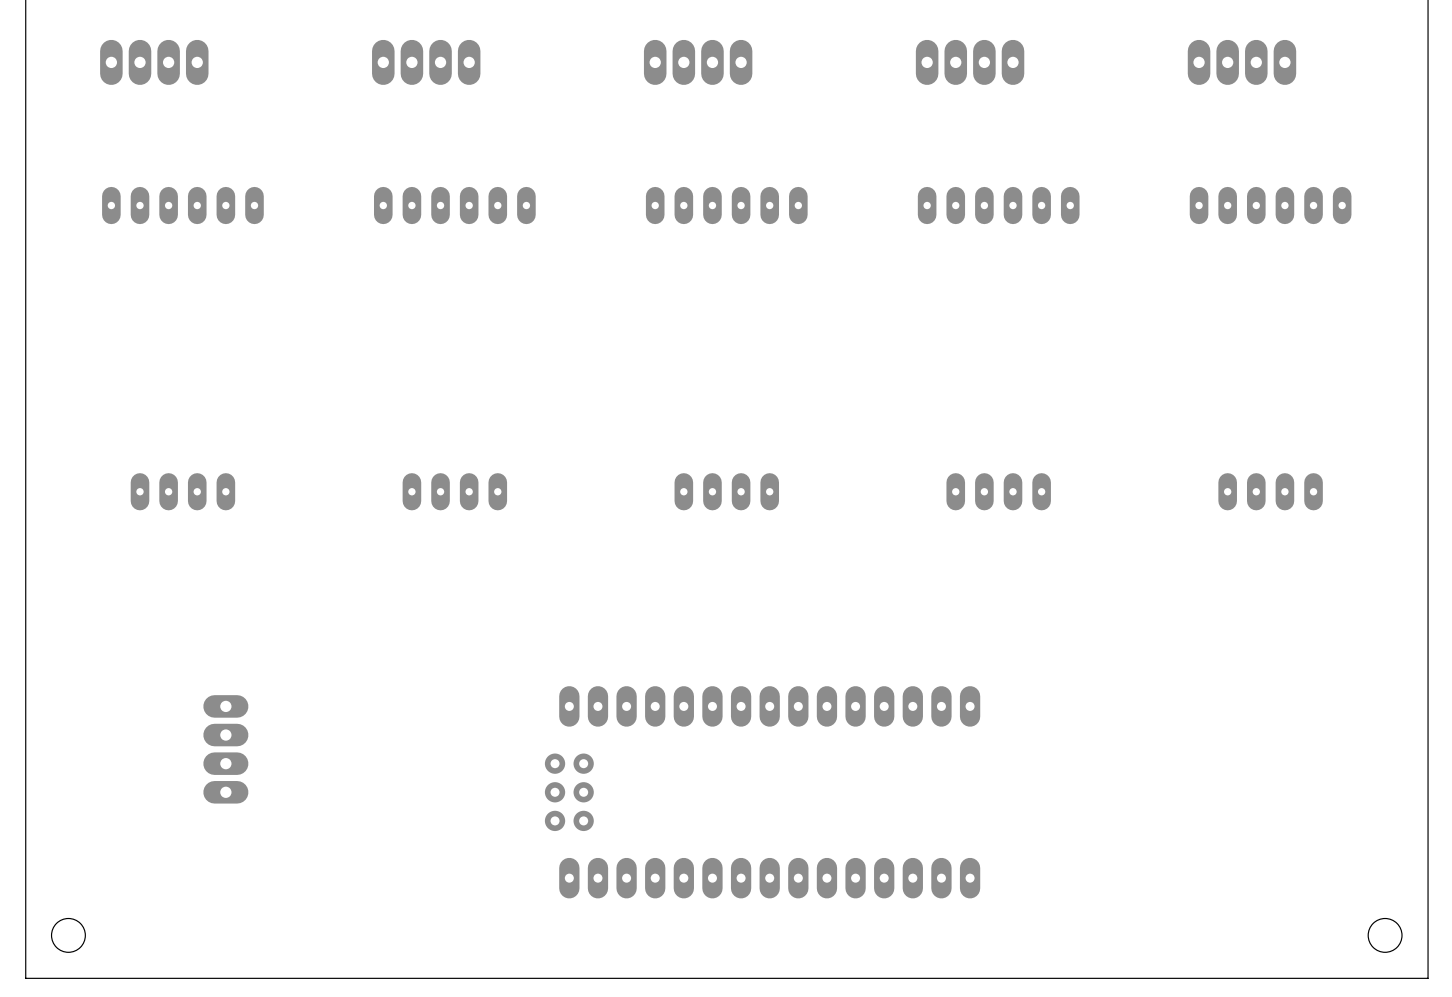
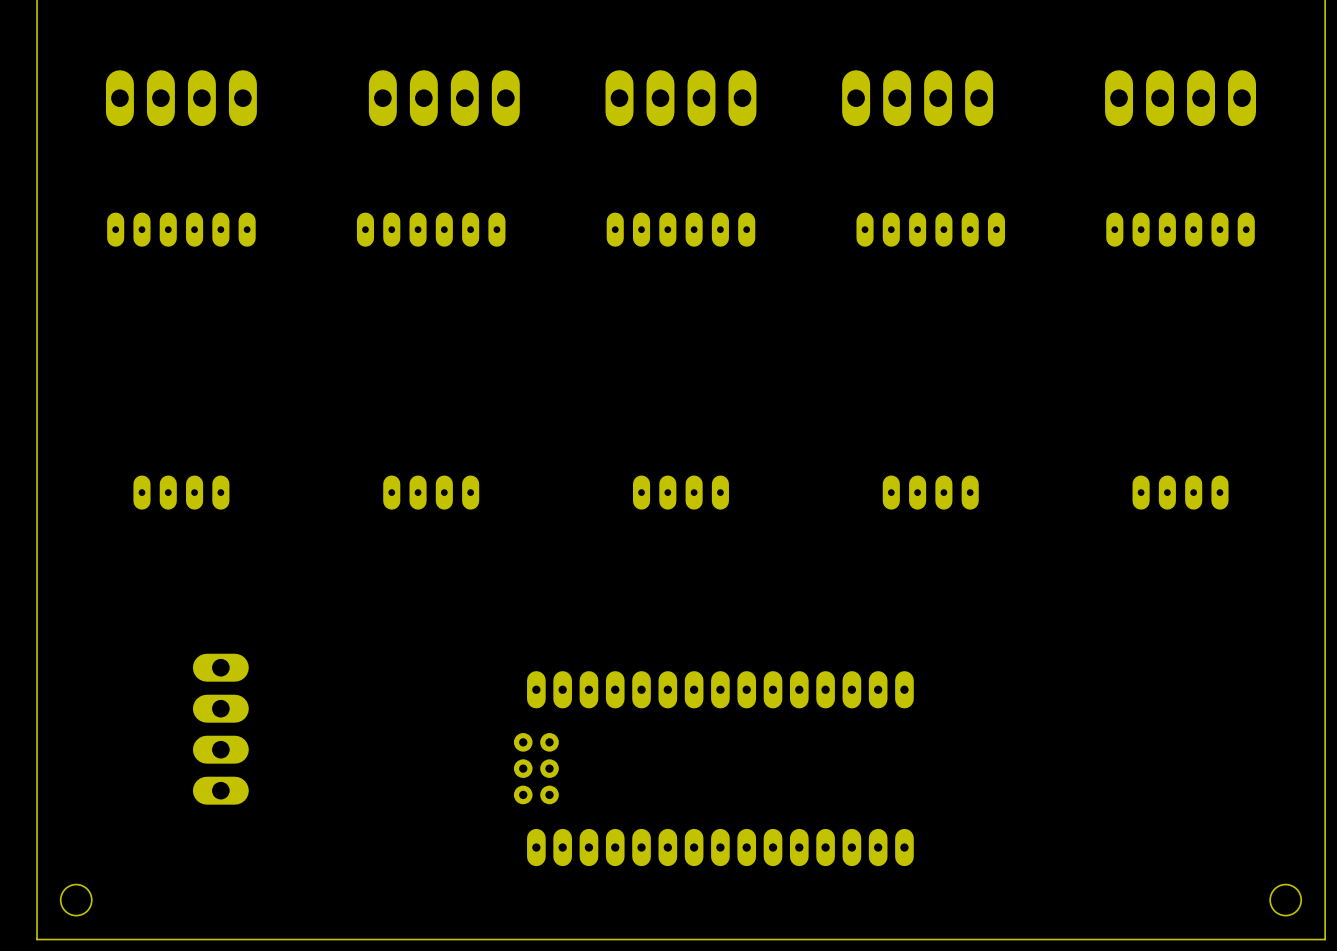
part: (154, 62) -> none
part: none -> (181, 98)
part: (426, 62) -> none
part: none -> (444, 98)
part: (698, 62) -> none
part: none -> (680, 98)
part: (970, 62) -> none
part: none -> (917, 98)
part: (1241, 62) -> none
part: none -> (1180, 98)
part footprint: [203, 695, 249, 804] -> [192, 653, 249, 805]

